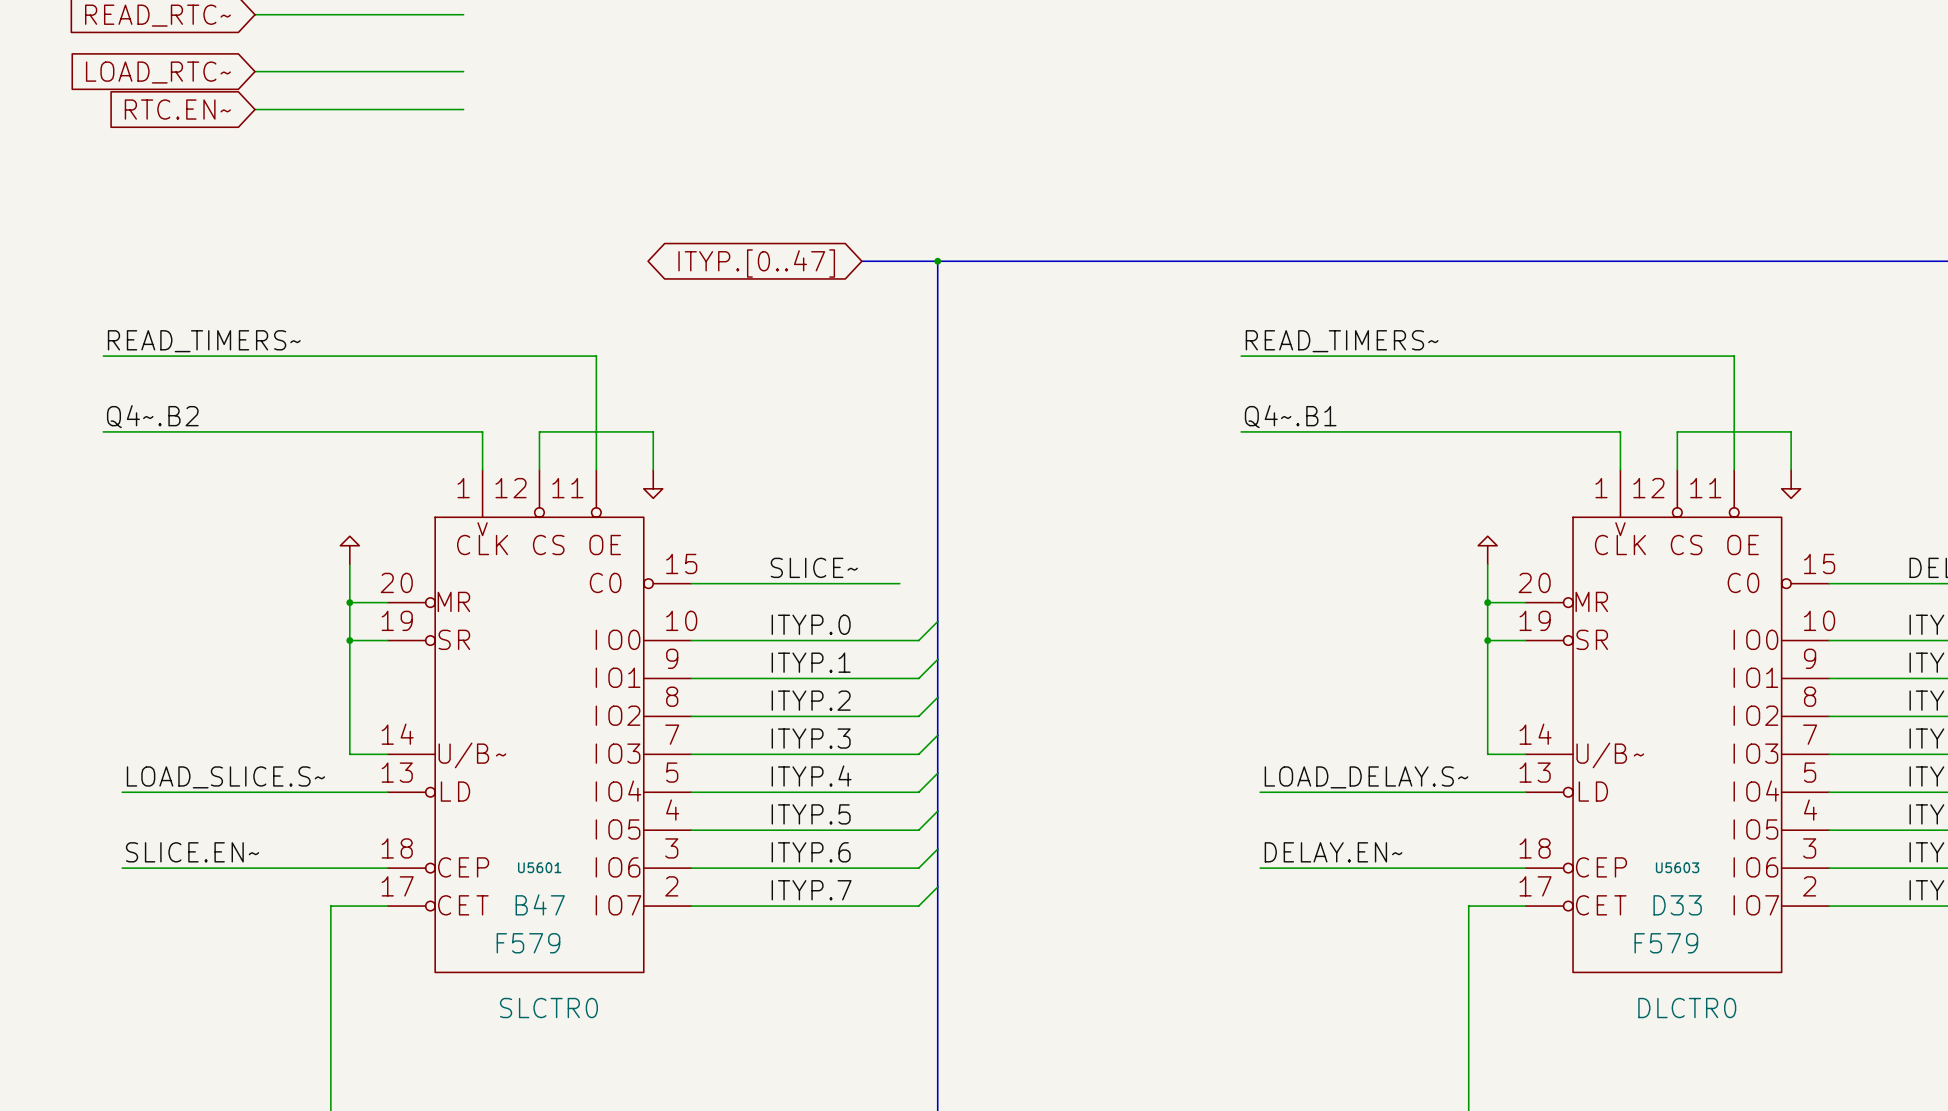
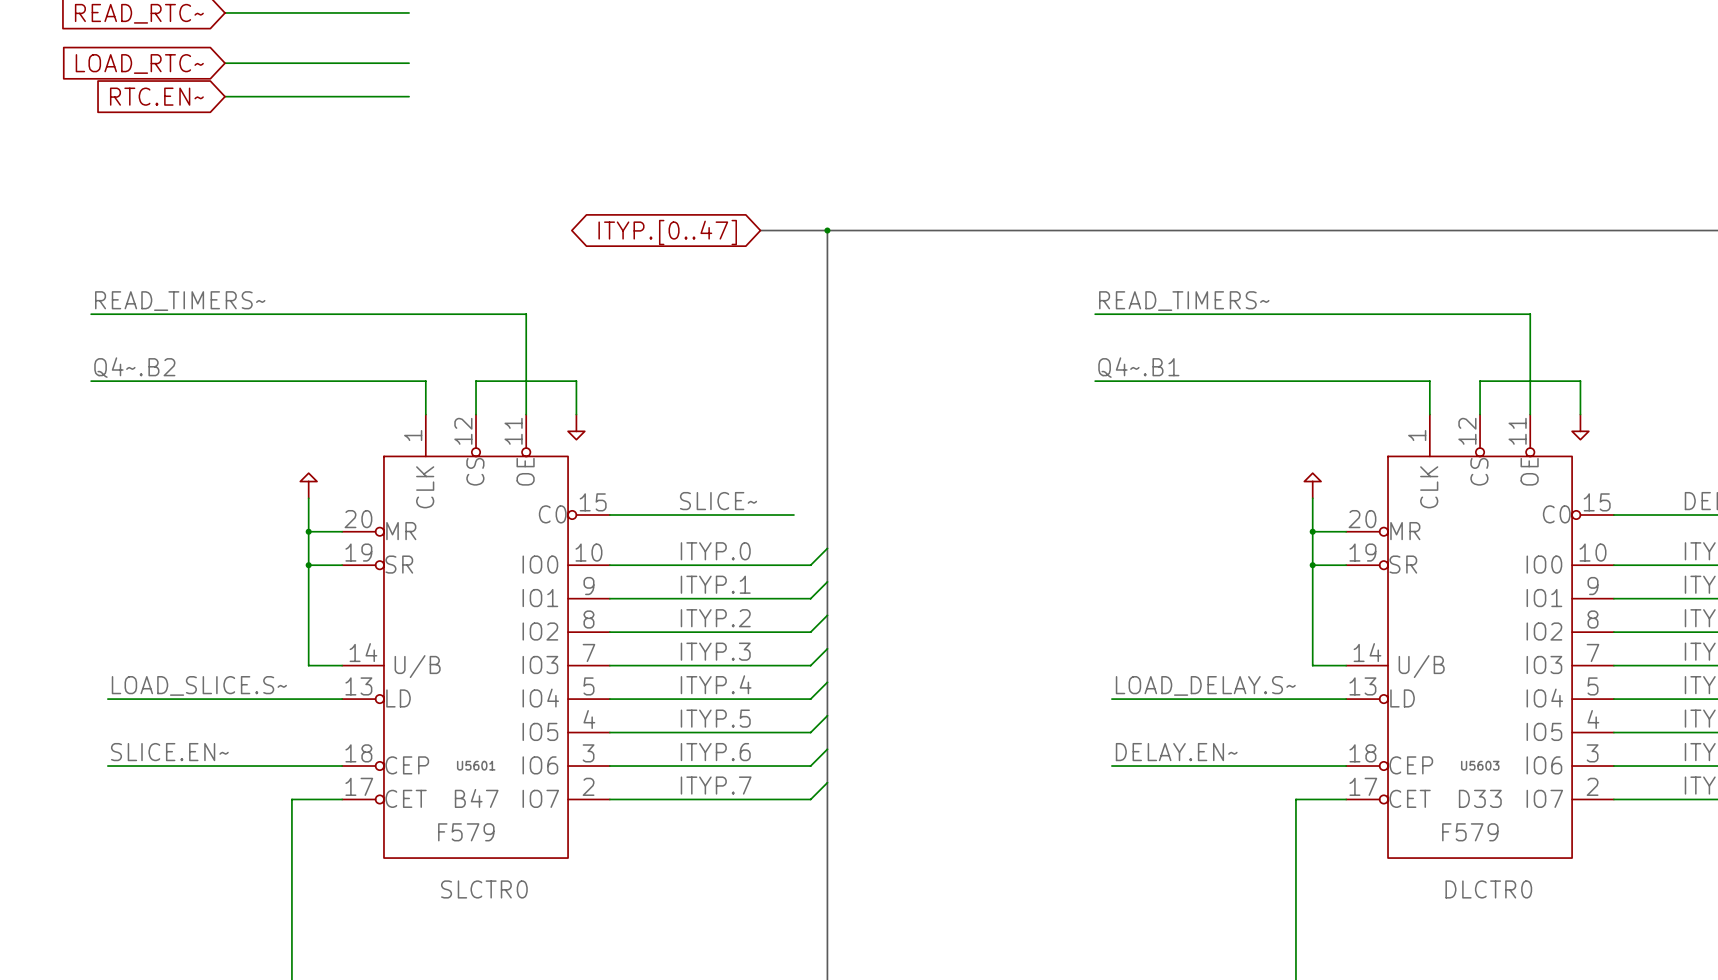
U5601 symbol: [387, 469, 692, 973] -> [342, 414, 610, 859]
U5603 symbol: [1525, 469, 1830, 973] -> [1346, 414, 1614, 859]

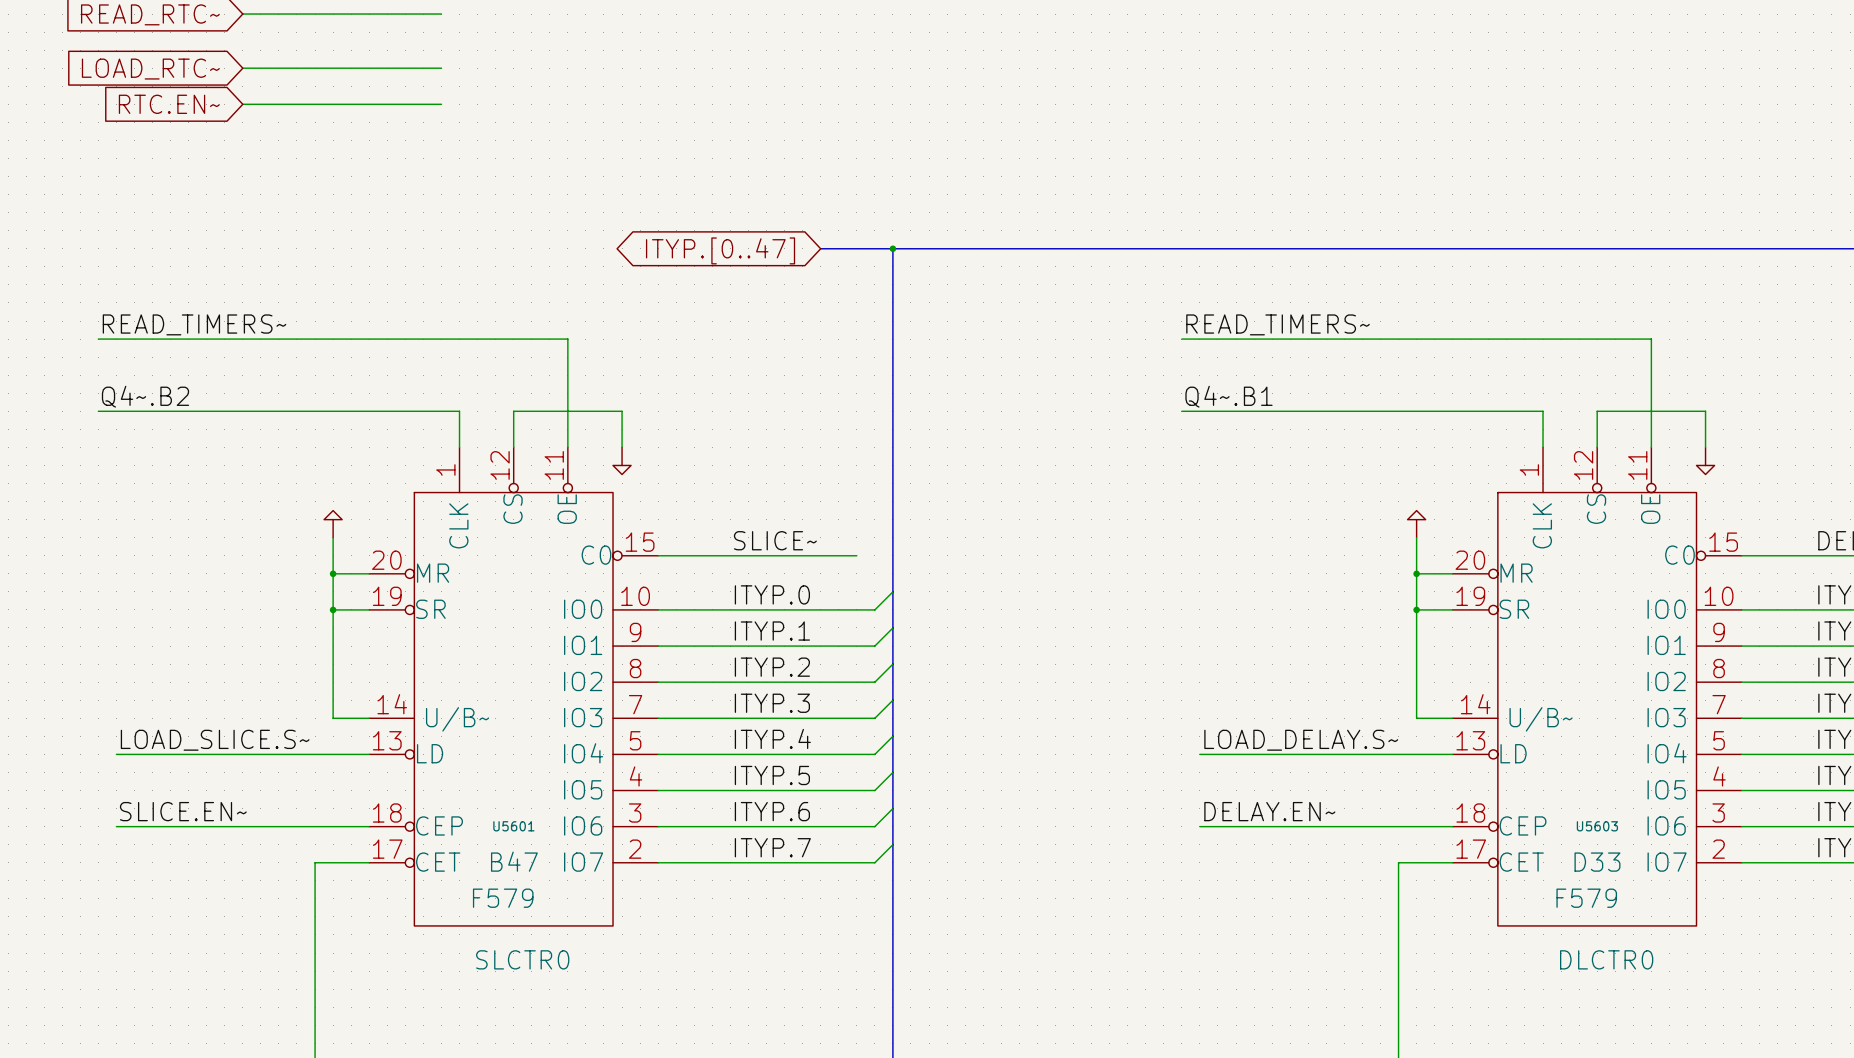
U5601 pin name: U/B (417, 666) -> U/B~ (457, 719)
U5603 pin name: U/B (1421, 666) -> U/B~ (1541, 719)

